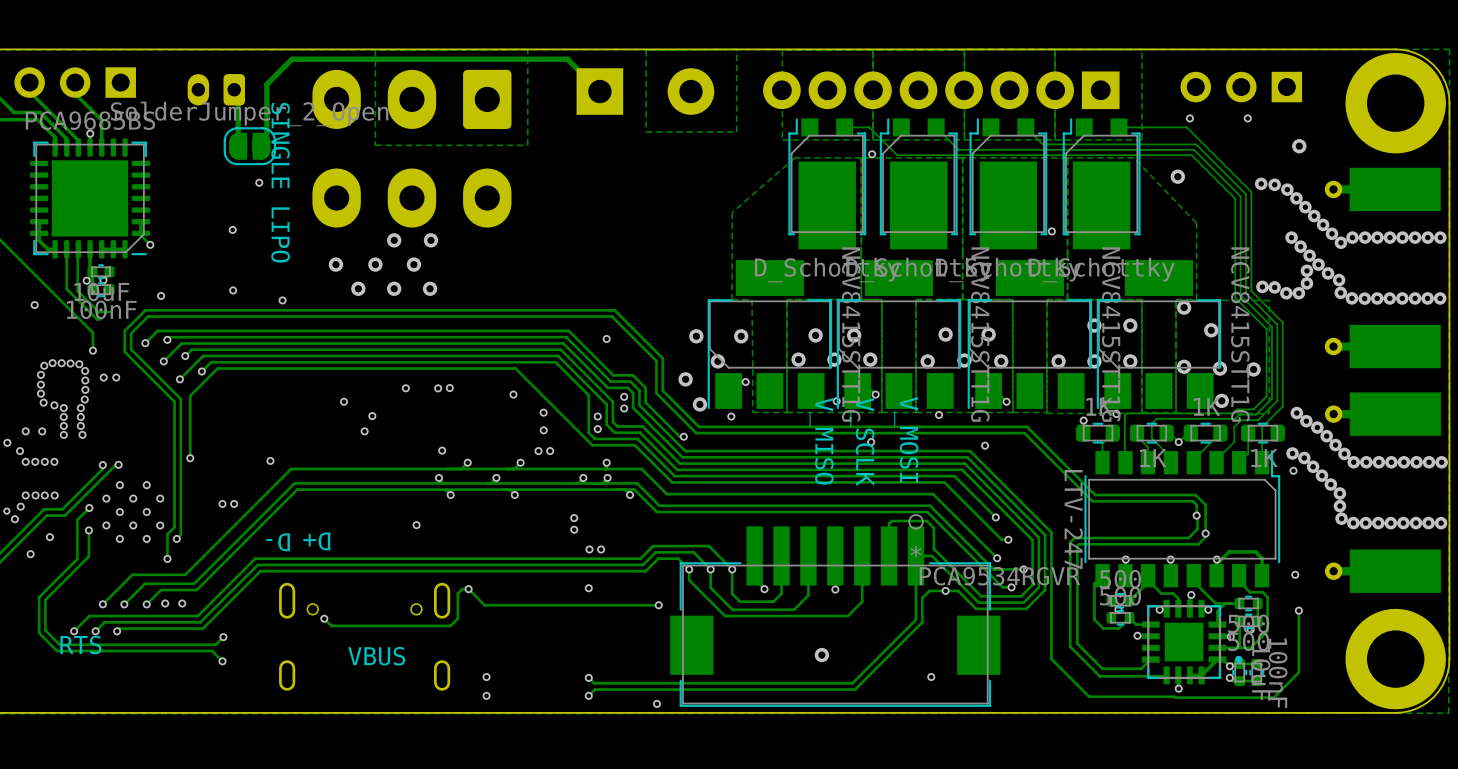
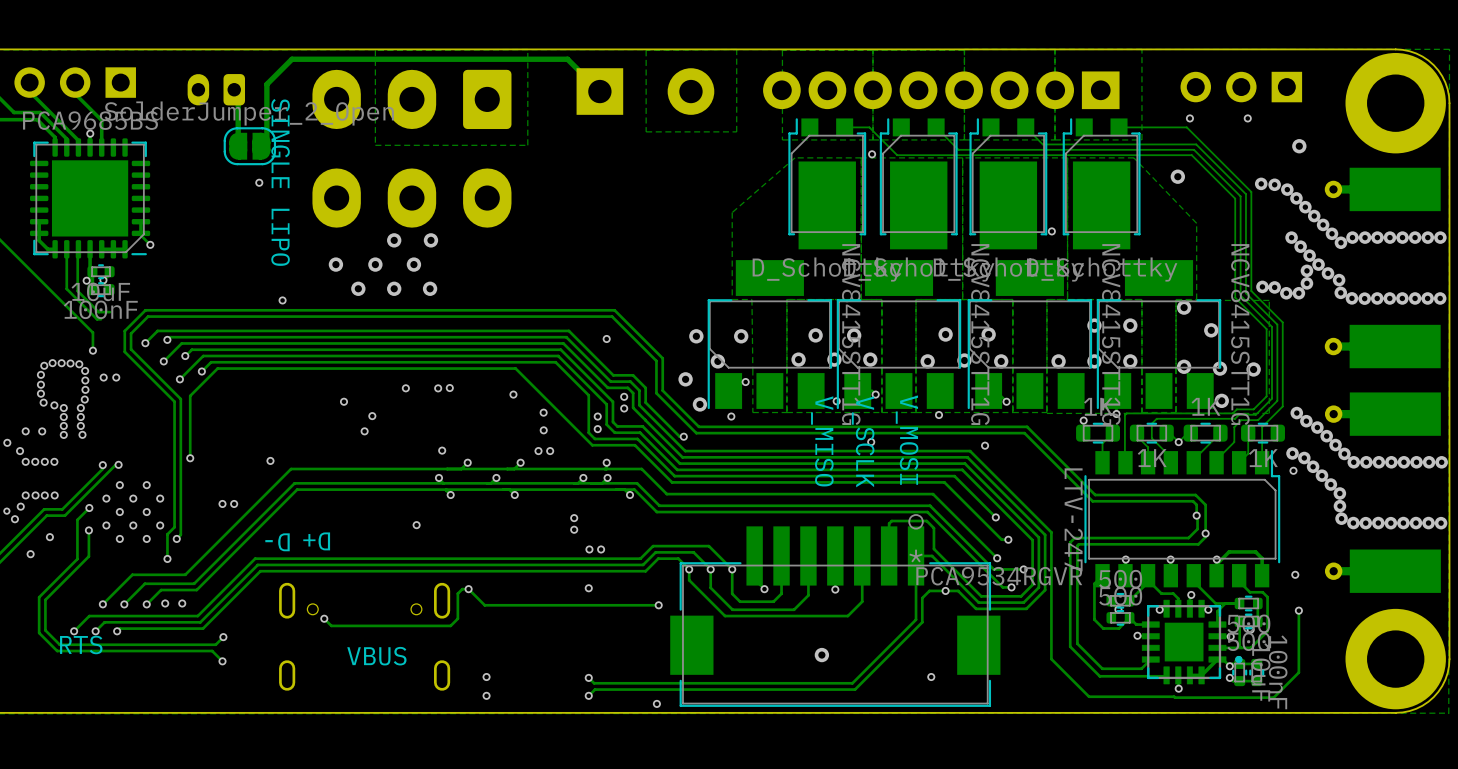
via: (232, 229) -> none
via: (233, 290) -> none
via: (161, 295) -> none
via: (34, 305) -> none

